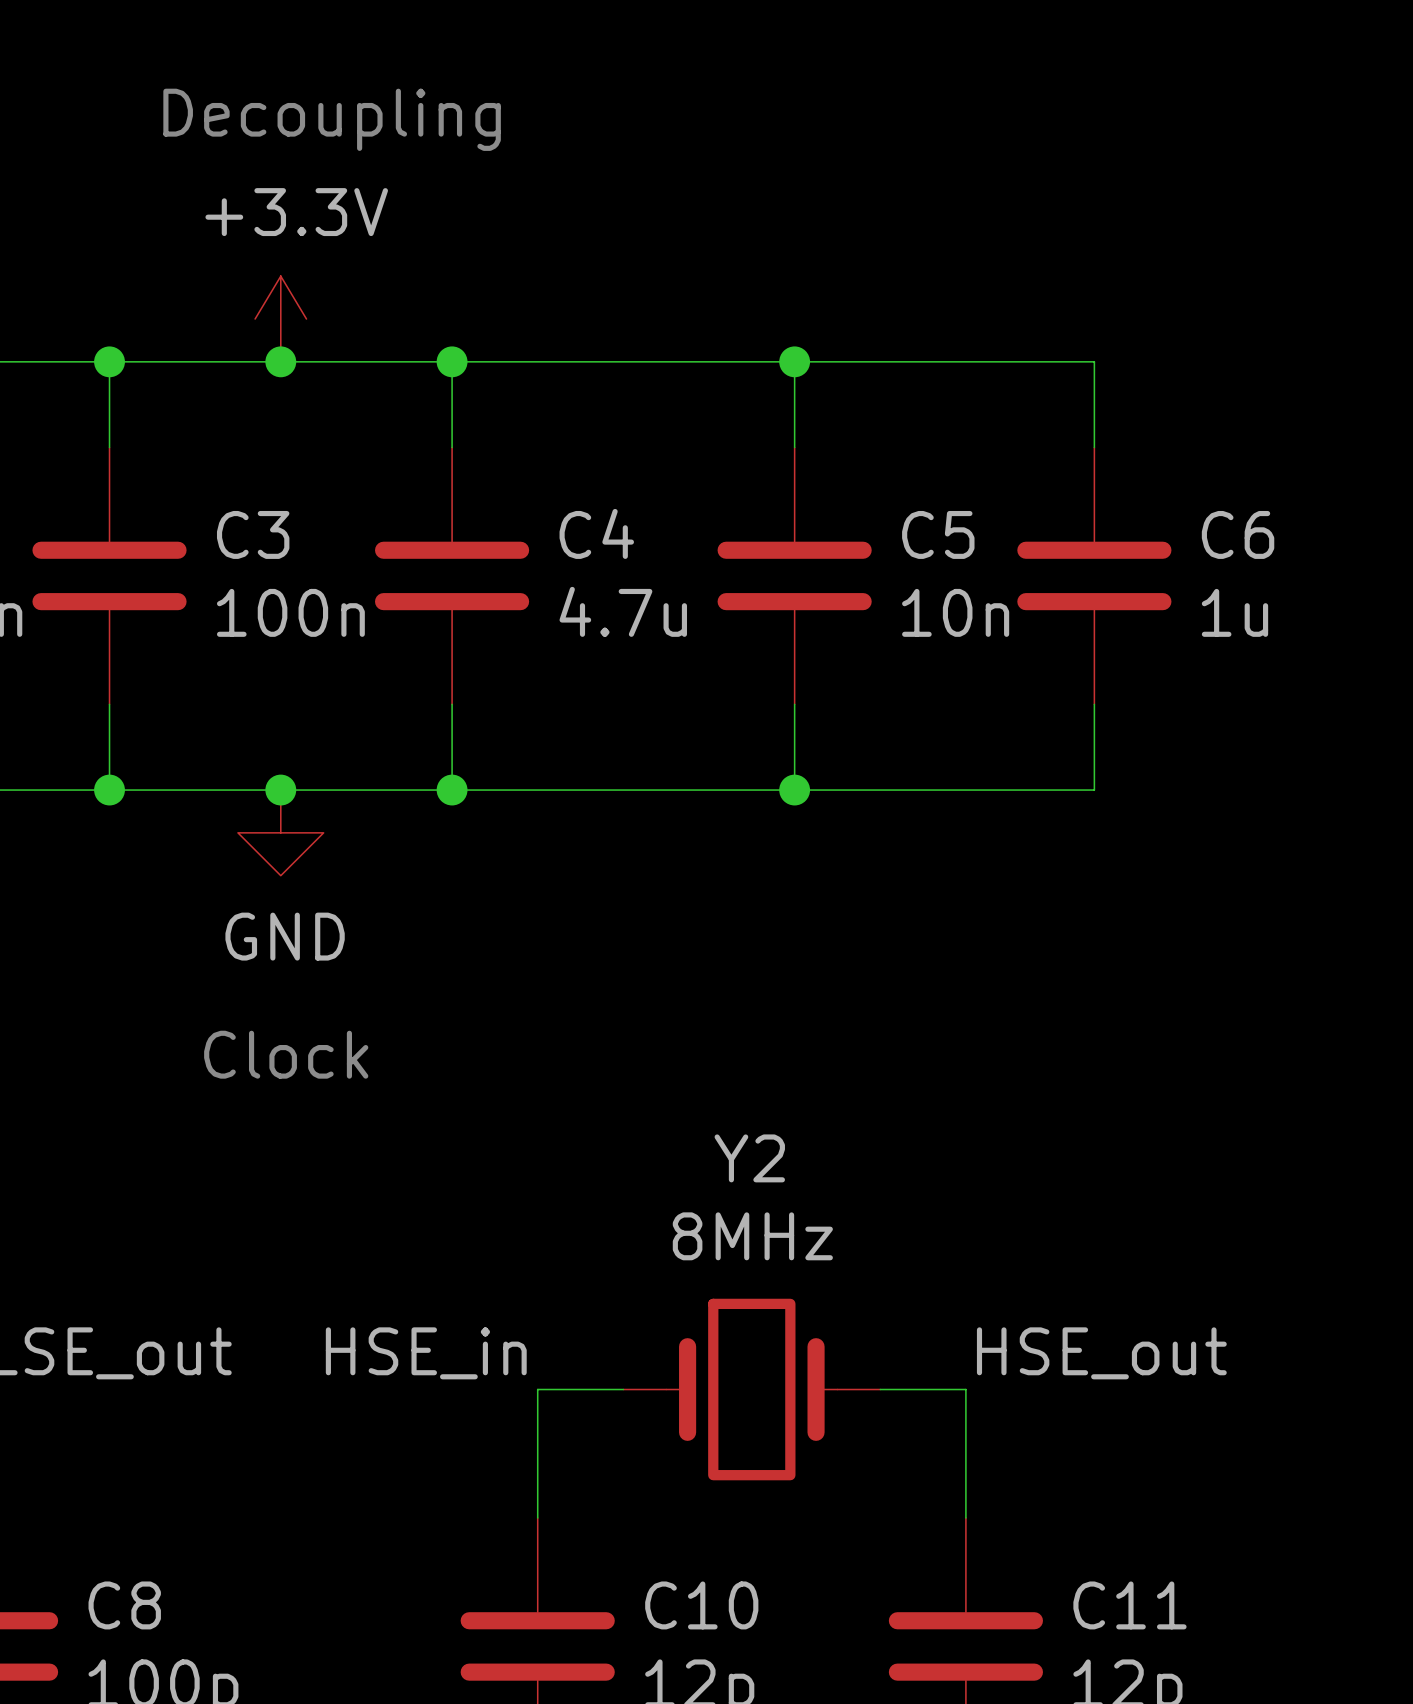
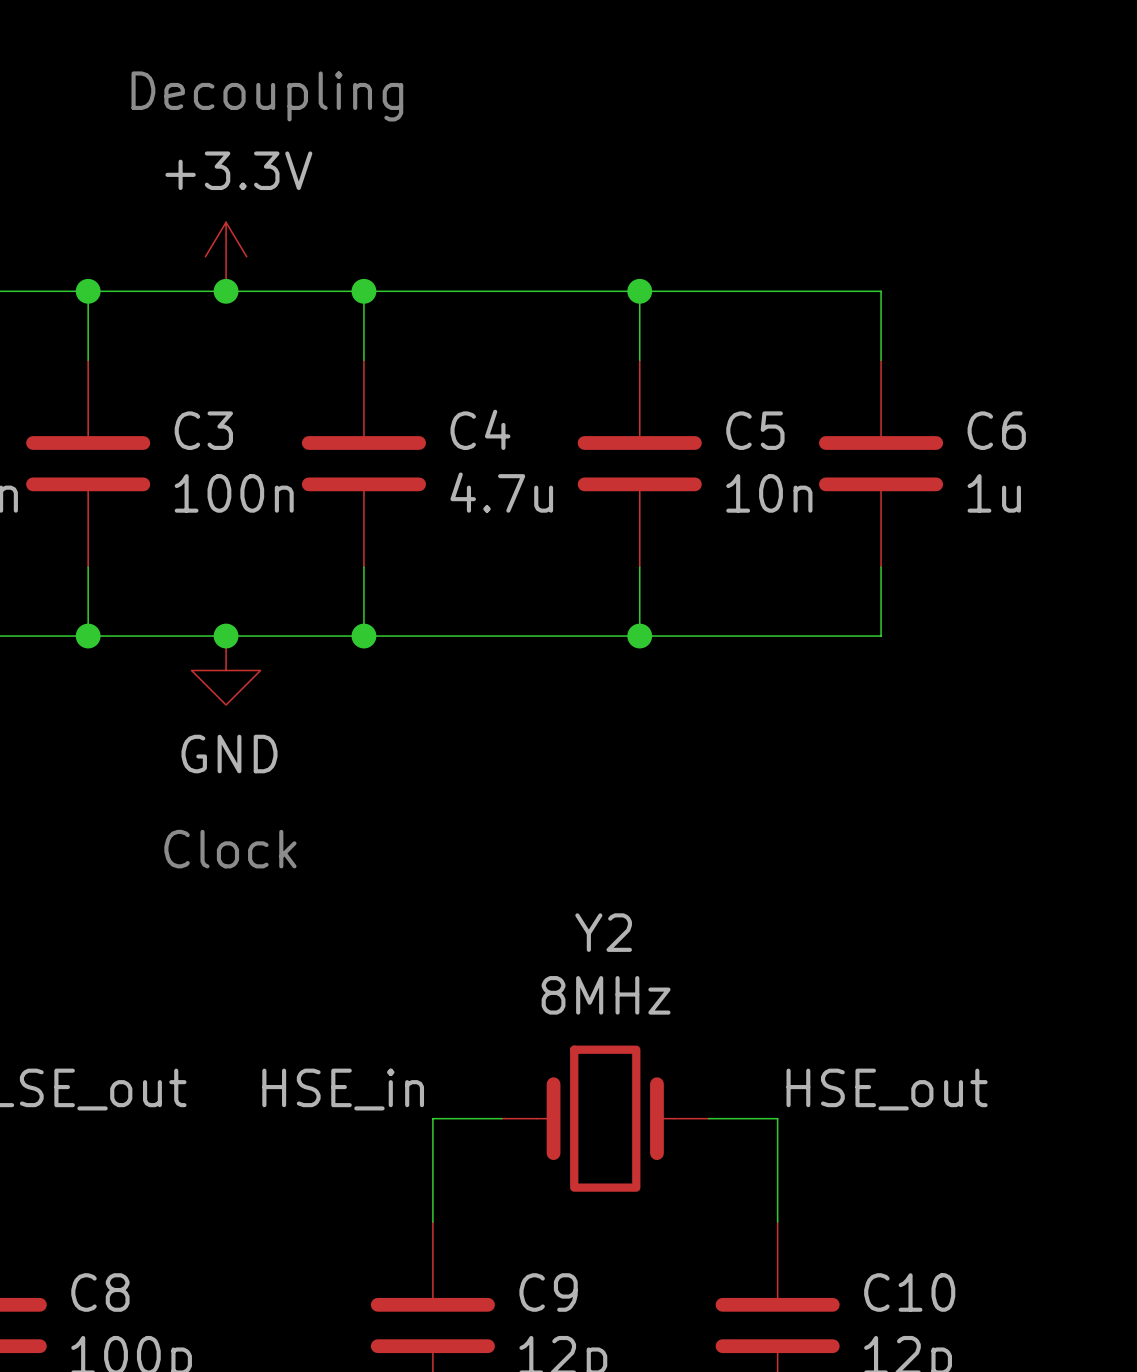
C10 name: C10 (701, 1605) -> C9 (548, 1292)
C11 name: C11 (1129, 1605) -> C10 (909, 1292)

